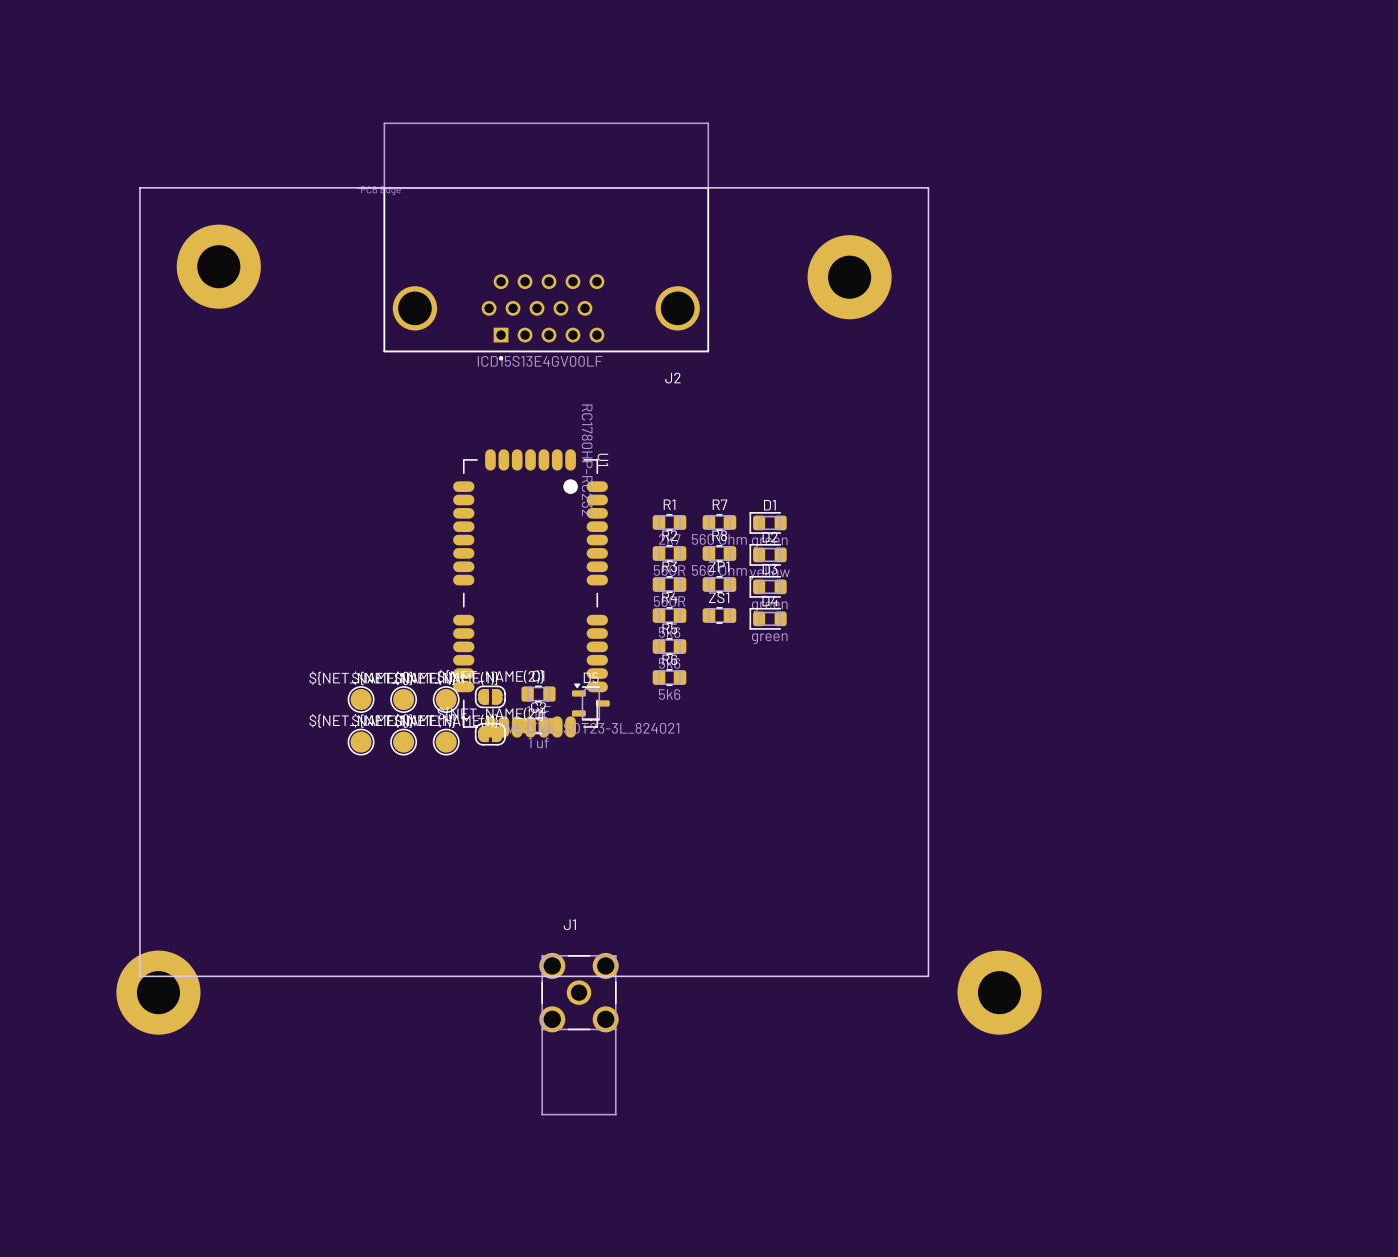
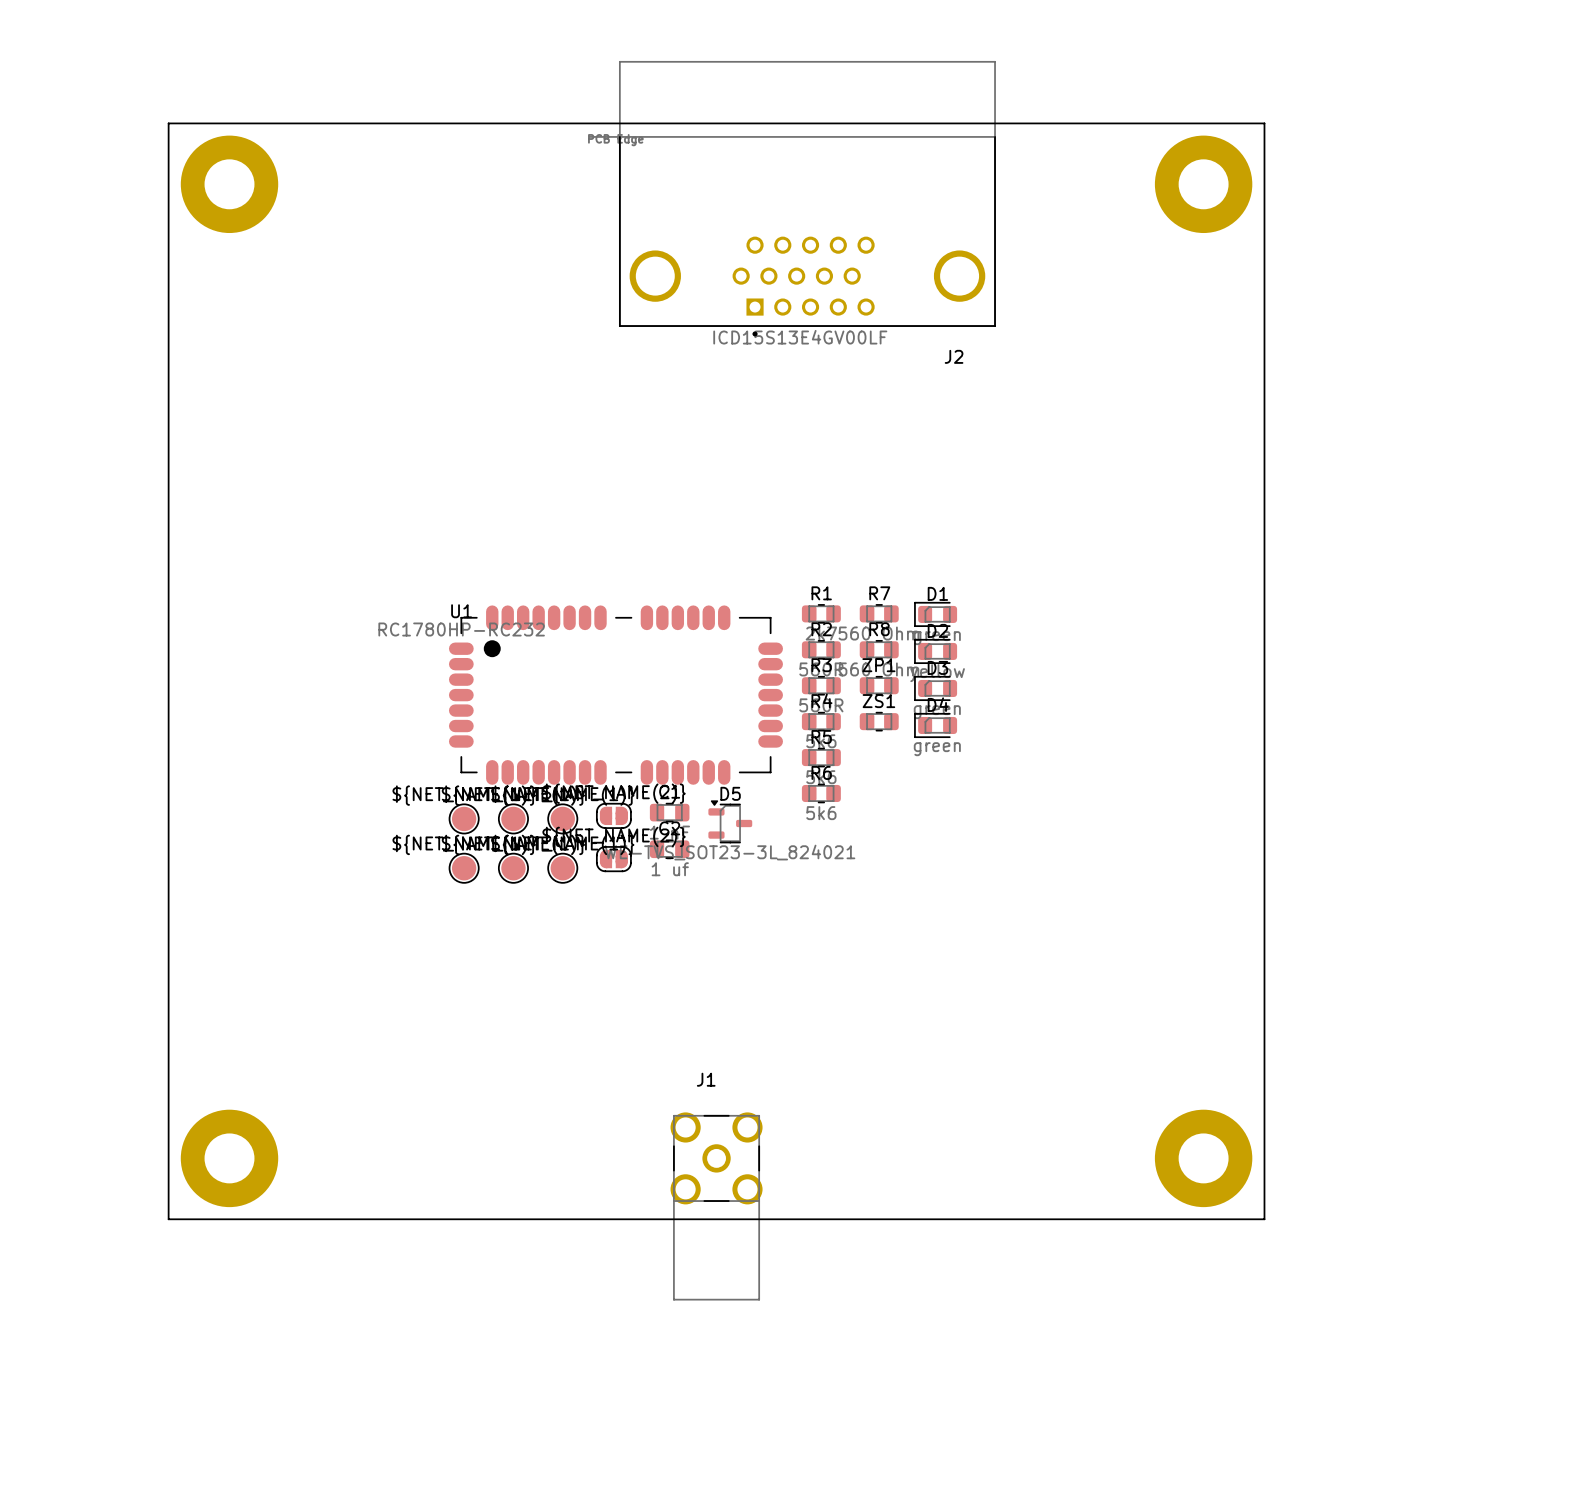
board edge: (139, 187) (928, 187) (928, 976) (139, 976) (139, 187) -> (168, 123) (168, 1219) (1264, 1219) (1264, 123) (168, 123)
J2 position: (533, 241) -> (792, 198)
part position: (218, 266) -> (229, 184)
part position: (849, 277) -> (1203, 184)
U1 rotation: 0° (530, 593) -> 90° counterclockwise (615, 695)

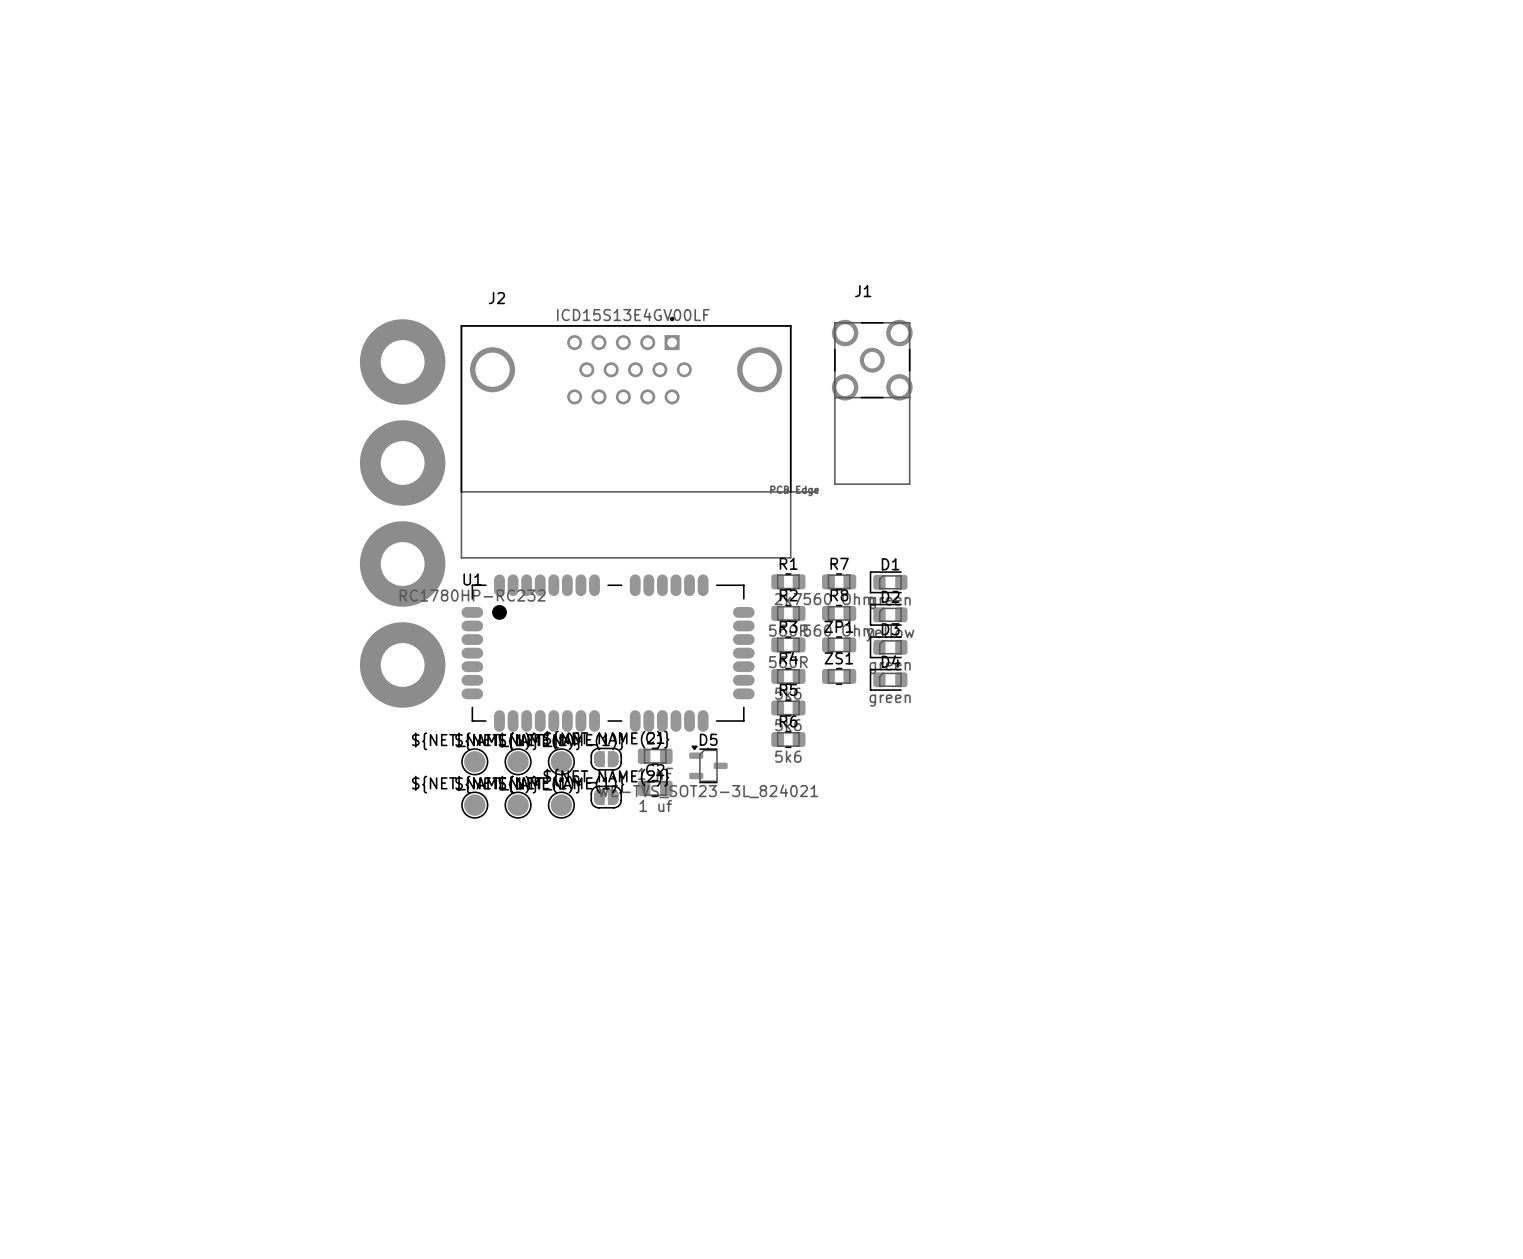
board edge: (168, 123) (1264, 123) (1264, 1219) (168, 1219) (168, 123) -> none
part: (229, 184) -> none
part: (1203, 184) -> none
J2 rotation: 0° (792, 198) -> 180° (639, 437)
J2 position: (792, 198) -> (639, 437)
part: none -> (402, 362)
part: none -> (402, 463)
part: none -> (402, 563)
part: none -> (402, 664)
part: (229, 1158) -> none
part: (1203, 1158) -> none
J1 position: (716, 1206) -> (872, 402)

